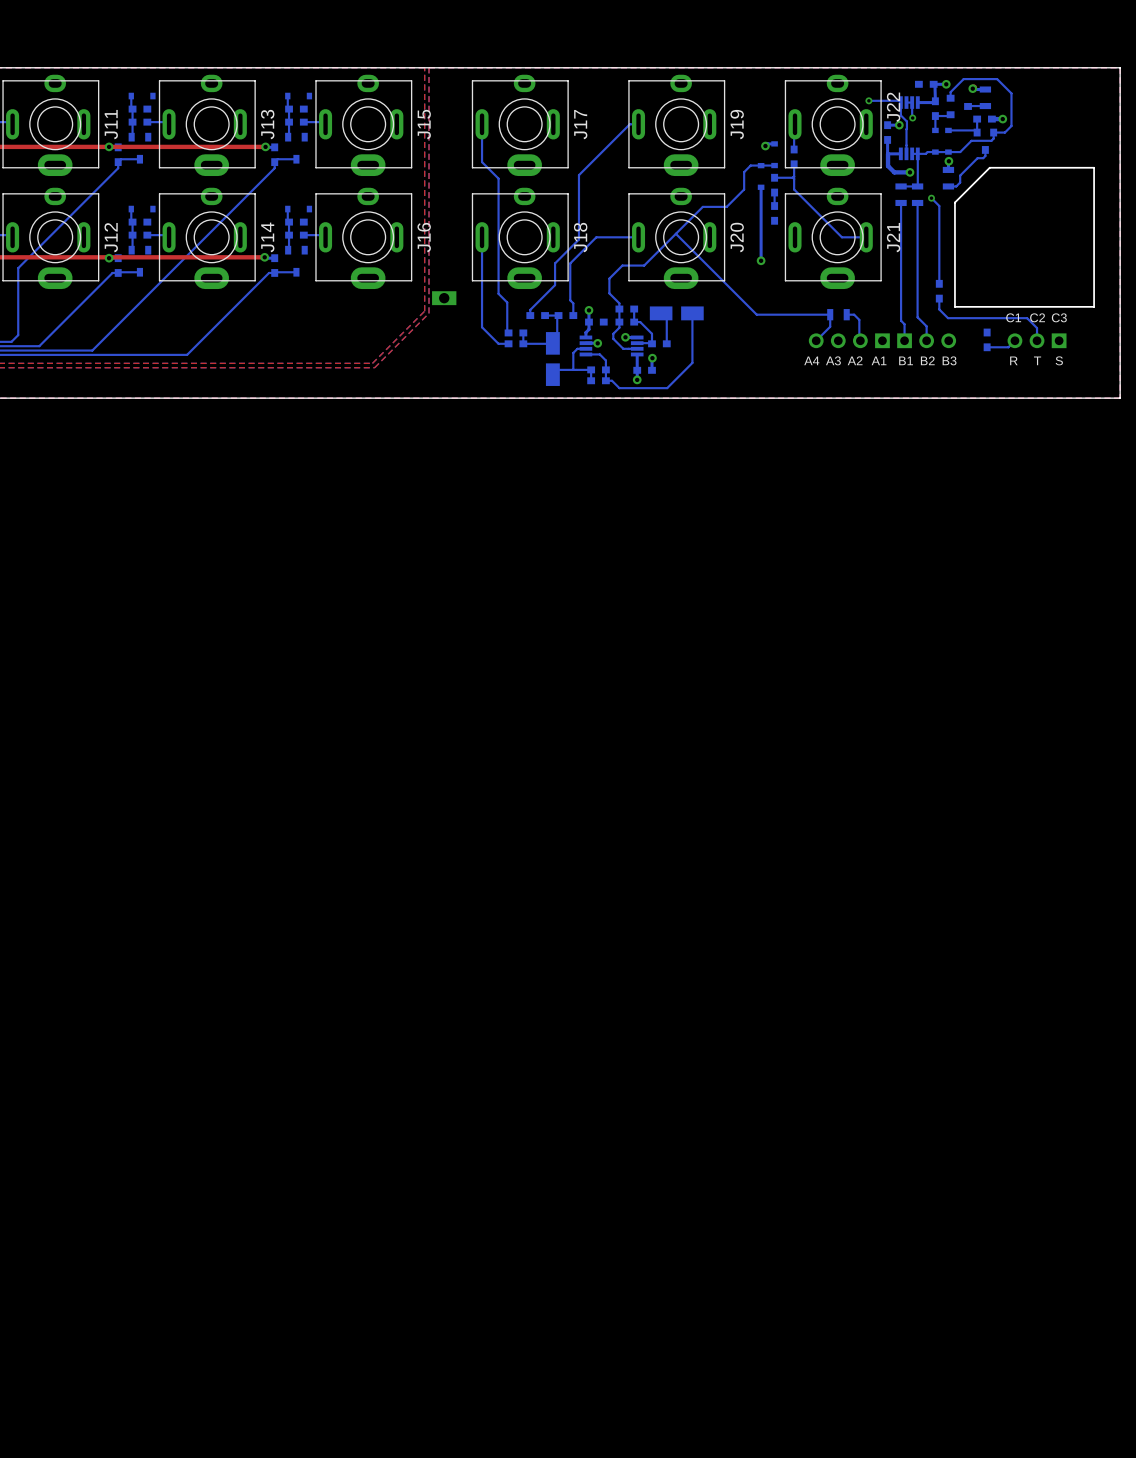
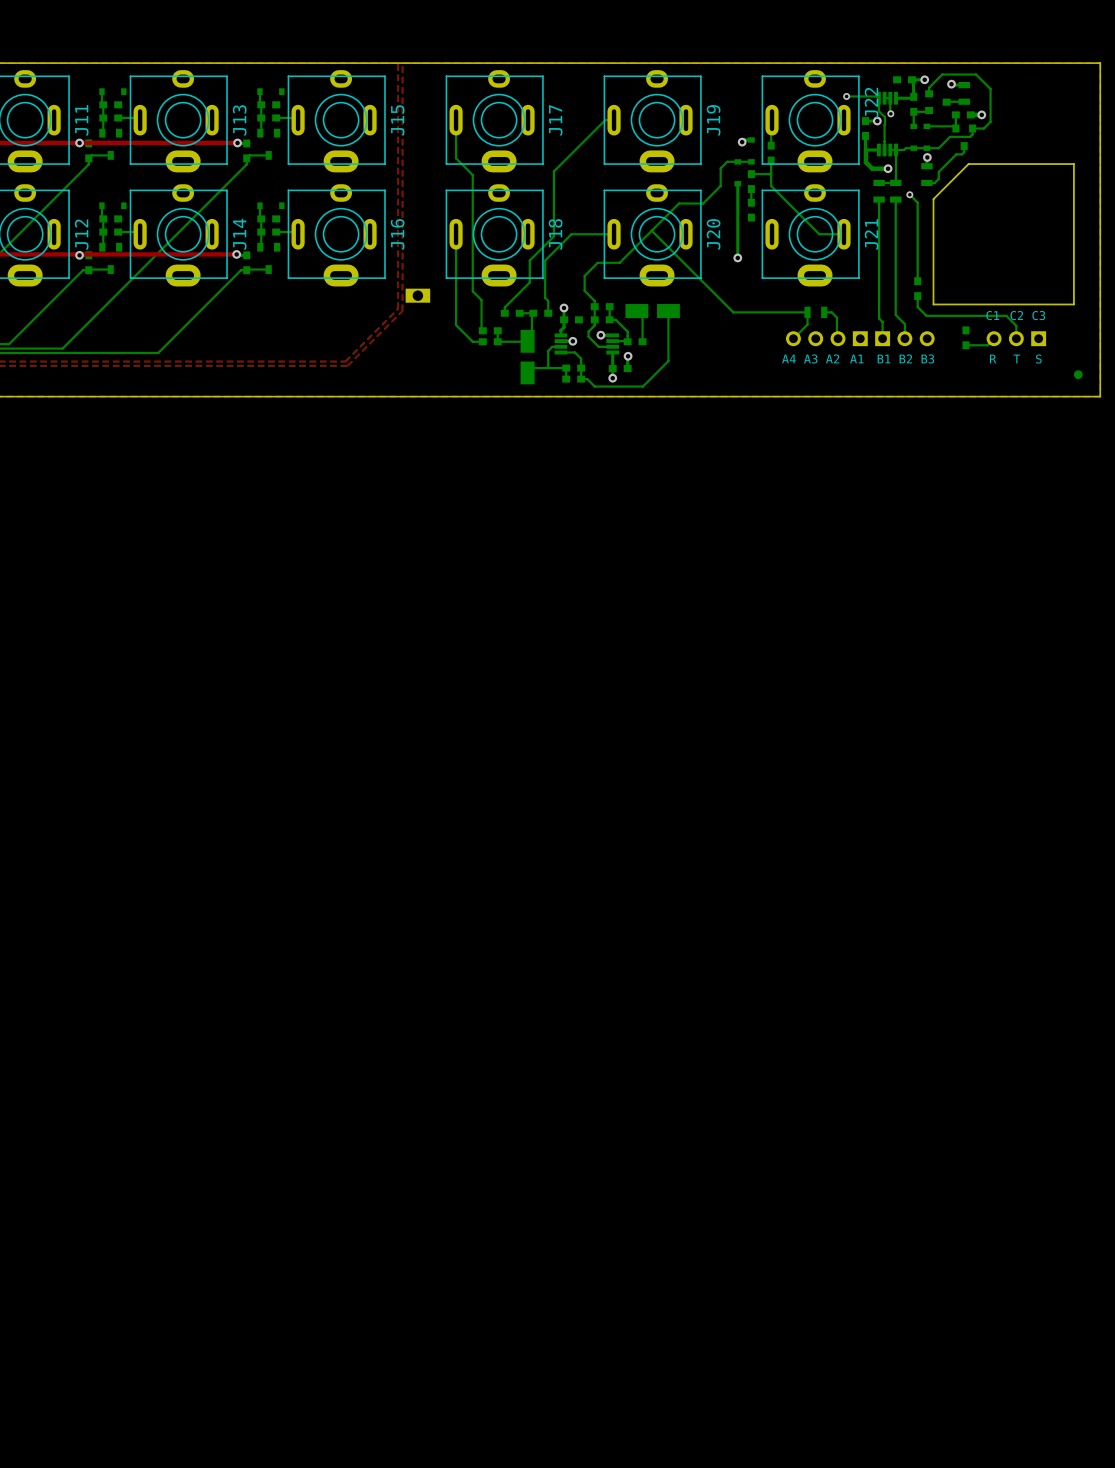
part: none -> (1078, 374)

